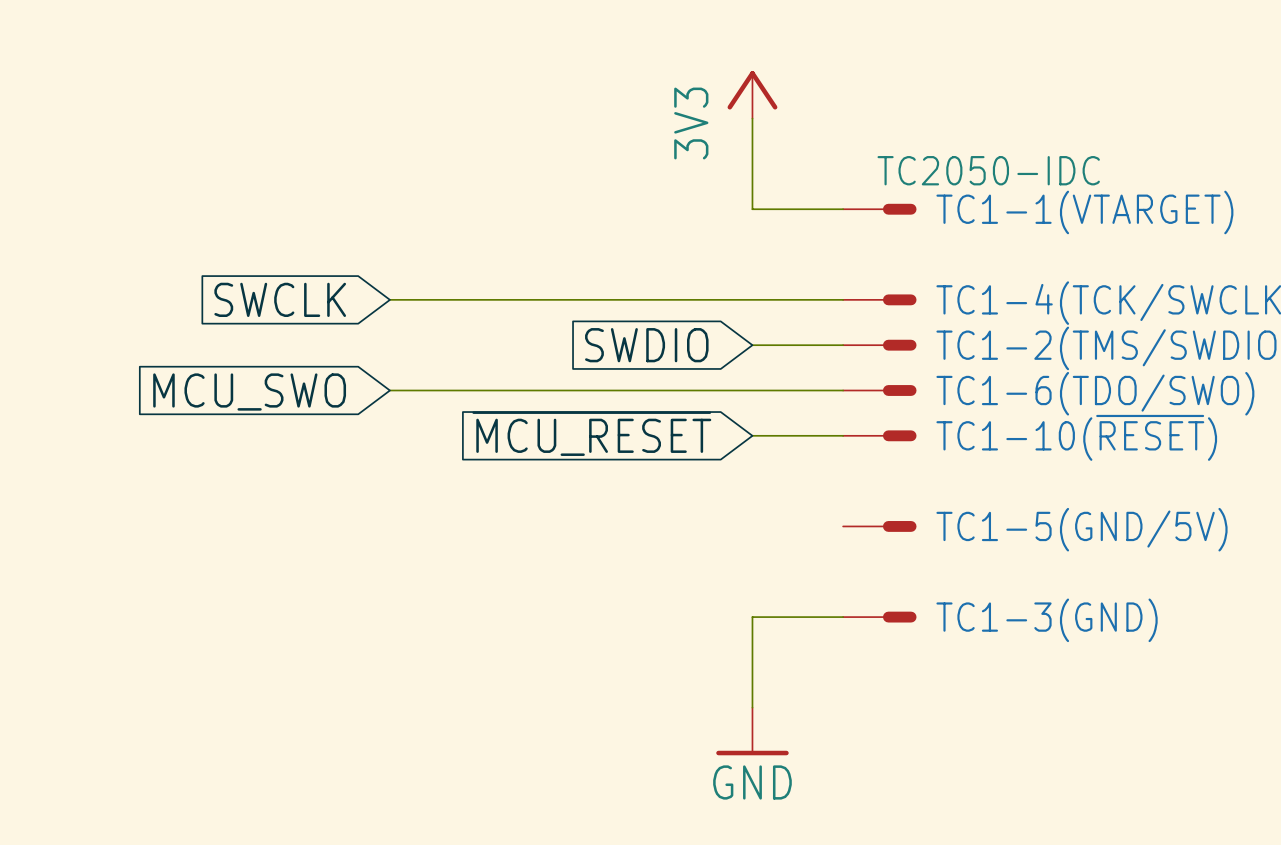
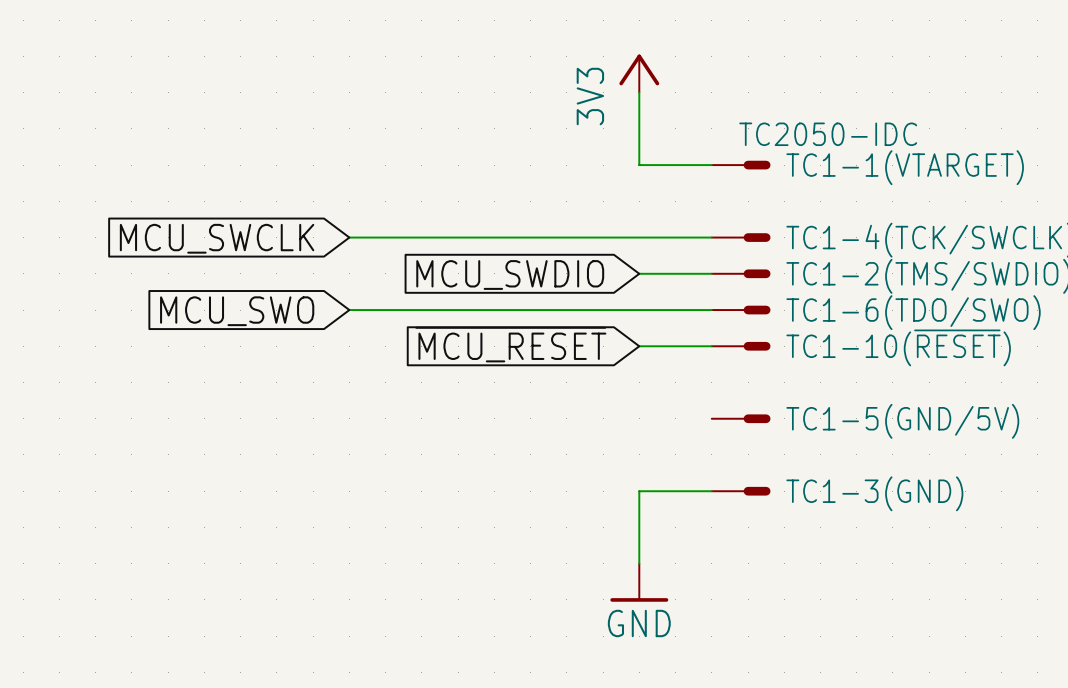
global label: SWCLK (280, 299) -> MCU_SWCLK (217, 238)
global label: SWDIO (646, 345) -> MCU_SWDIO (510, 275)

